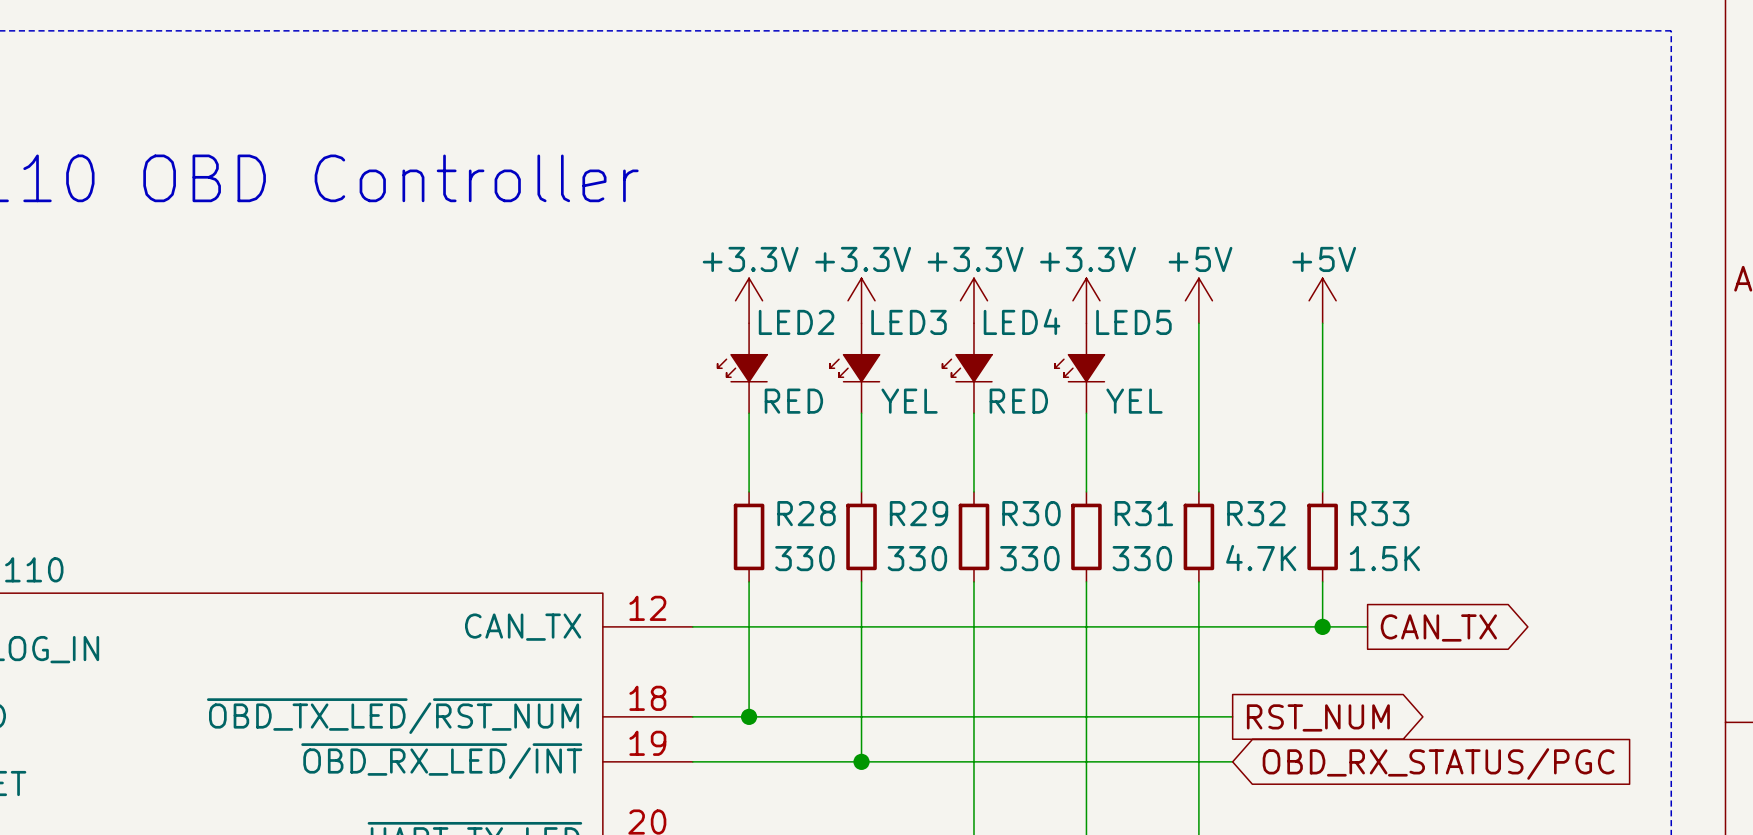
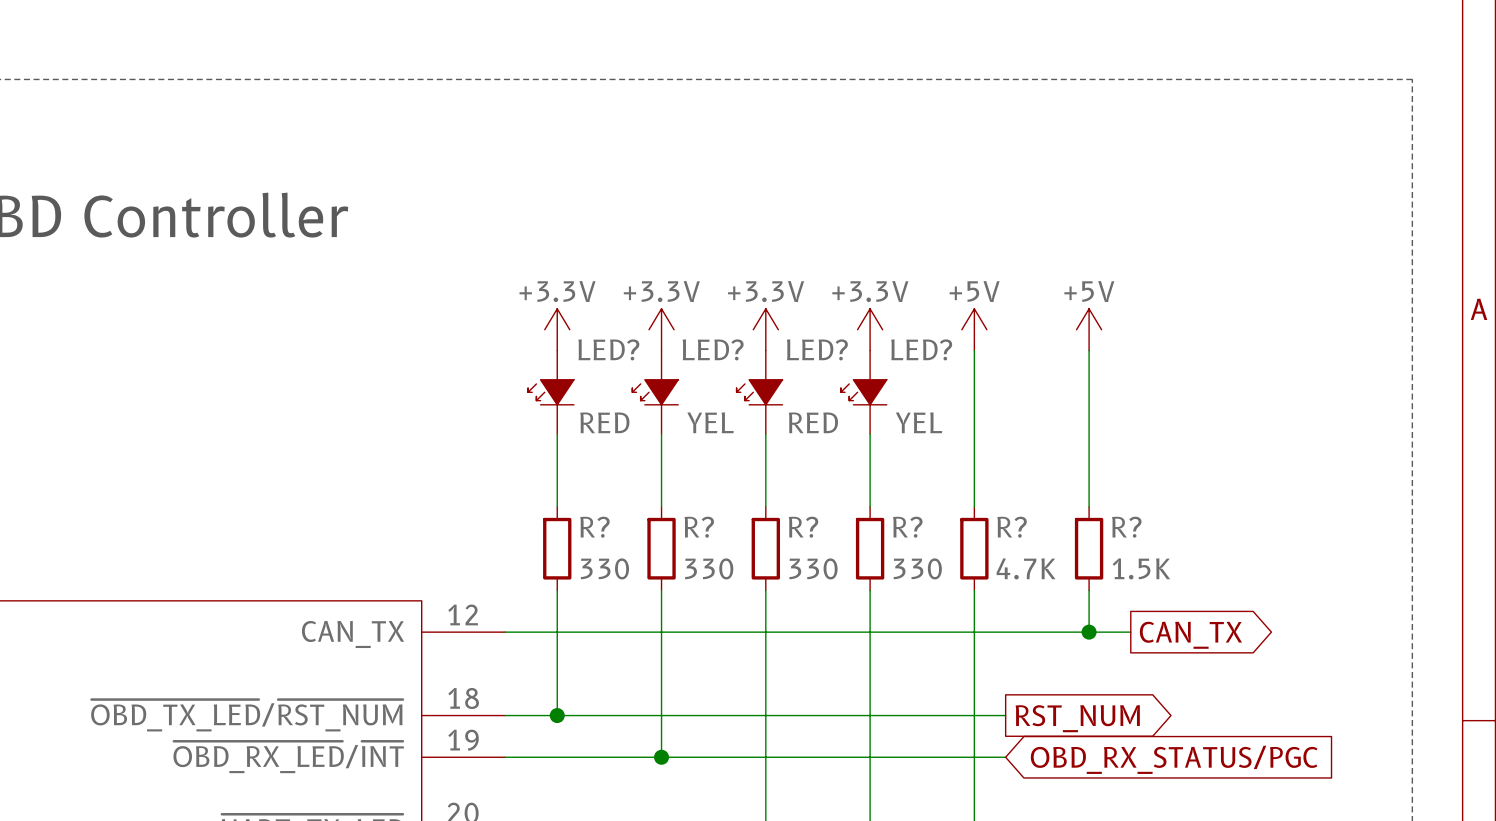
LED4 name: LED4 (1022, 321) -> LED? (817, 349)
LED2 name: LED2 (796, 322) -> LED? (608, 349)
LED3 name: LED3 (909, 322) -> LED? (713, 349)
LED5 name: LED5 (1133, 322) -> LED? (921, 349)
R28 name: R28 (806, 513) -> R? (594, 527)
R29 name: R29 (919, 513) -> R? (699, 527)
R30 name: R30 (1031, 513) -> R? (803, 527)
R31 name: R31 (1143, 513) -> R? (907, 527)
R32 name: R32 (1256, 513) -> R? (1012, 527)
R33 name: R33 (1380, 513) -> R? (1126, 527)

